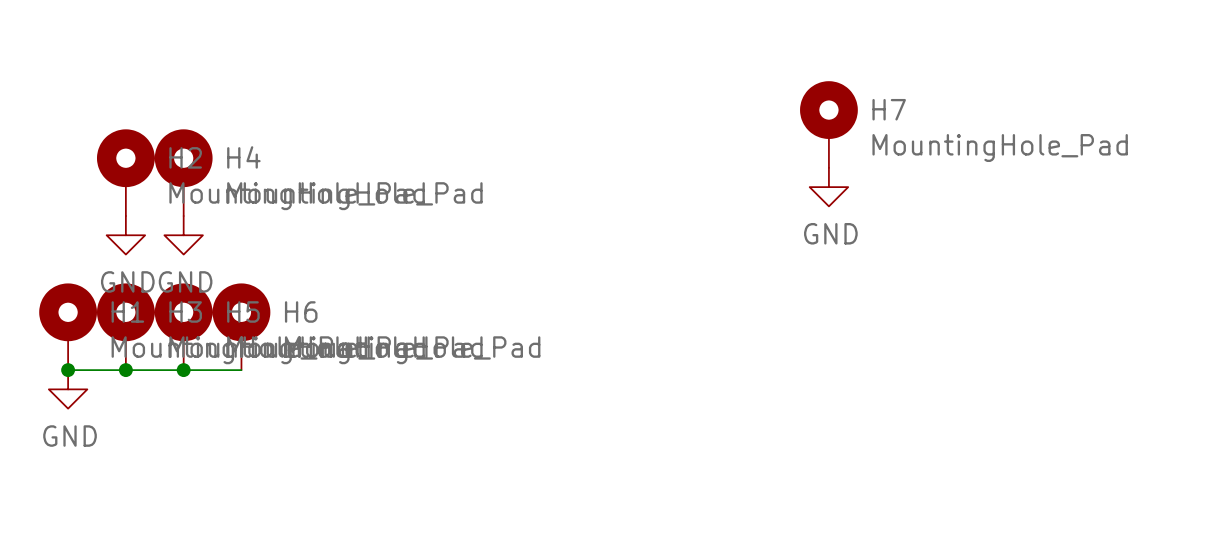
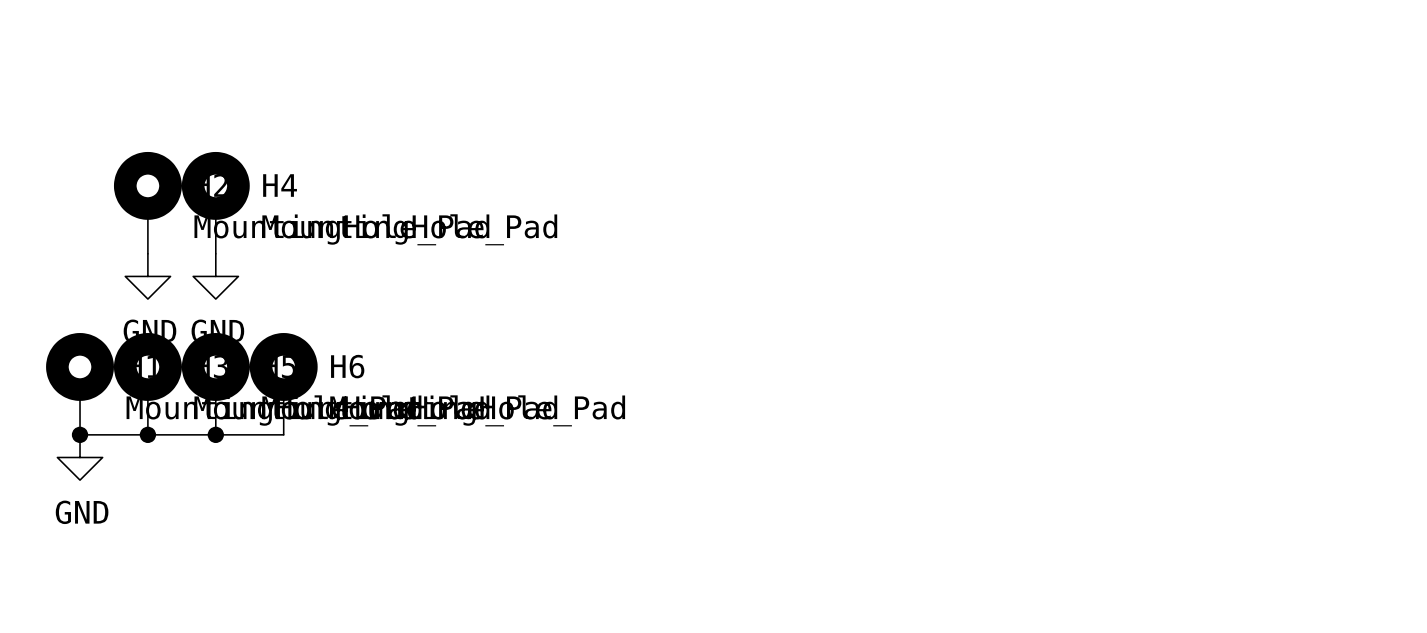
H7: MountingHole_Pad (828, 124) -> none
power symbol: GND (828, 187) -> none

